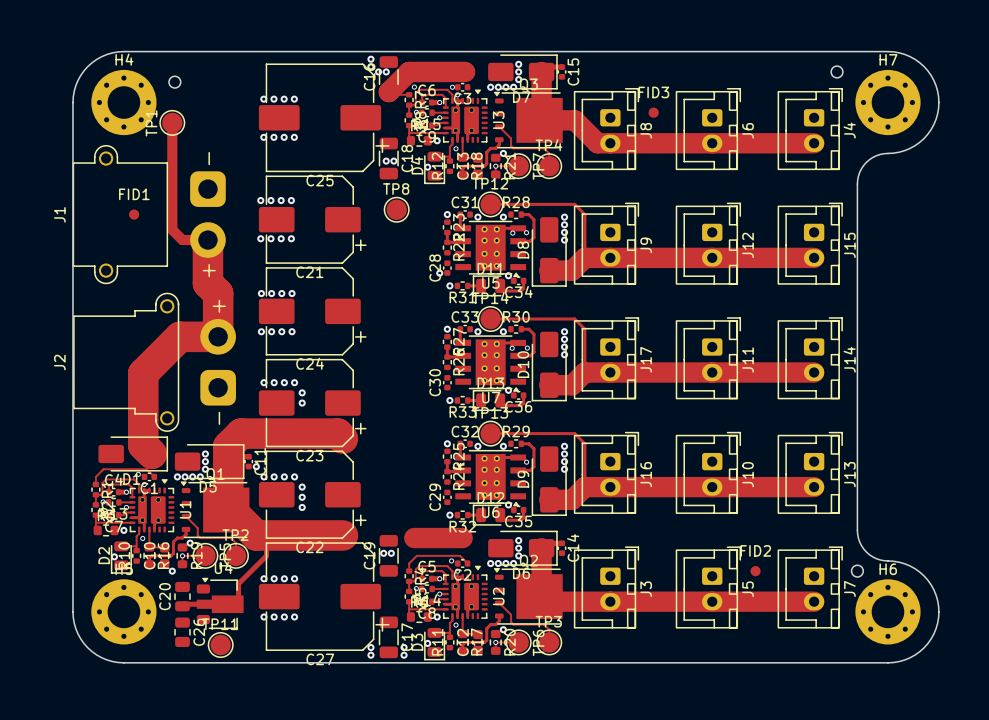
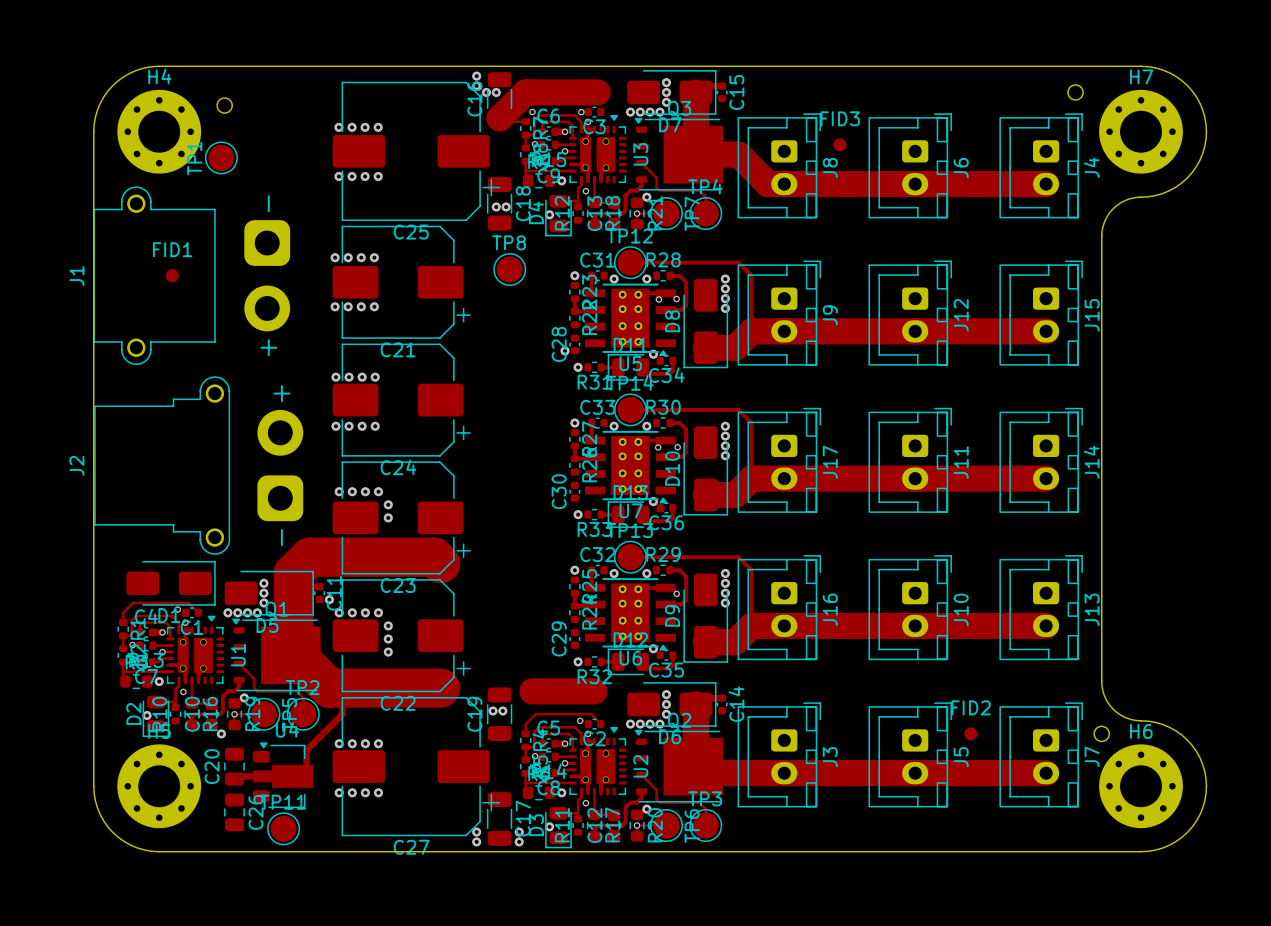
track: (172, 122) (172, 229) (182, 240) (207, 240) (207, 283) (218, 293) (218, 336) (179, 336) (143, 373) (143, 445) (151, 453) -> none

